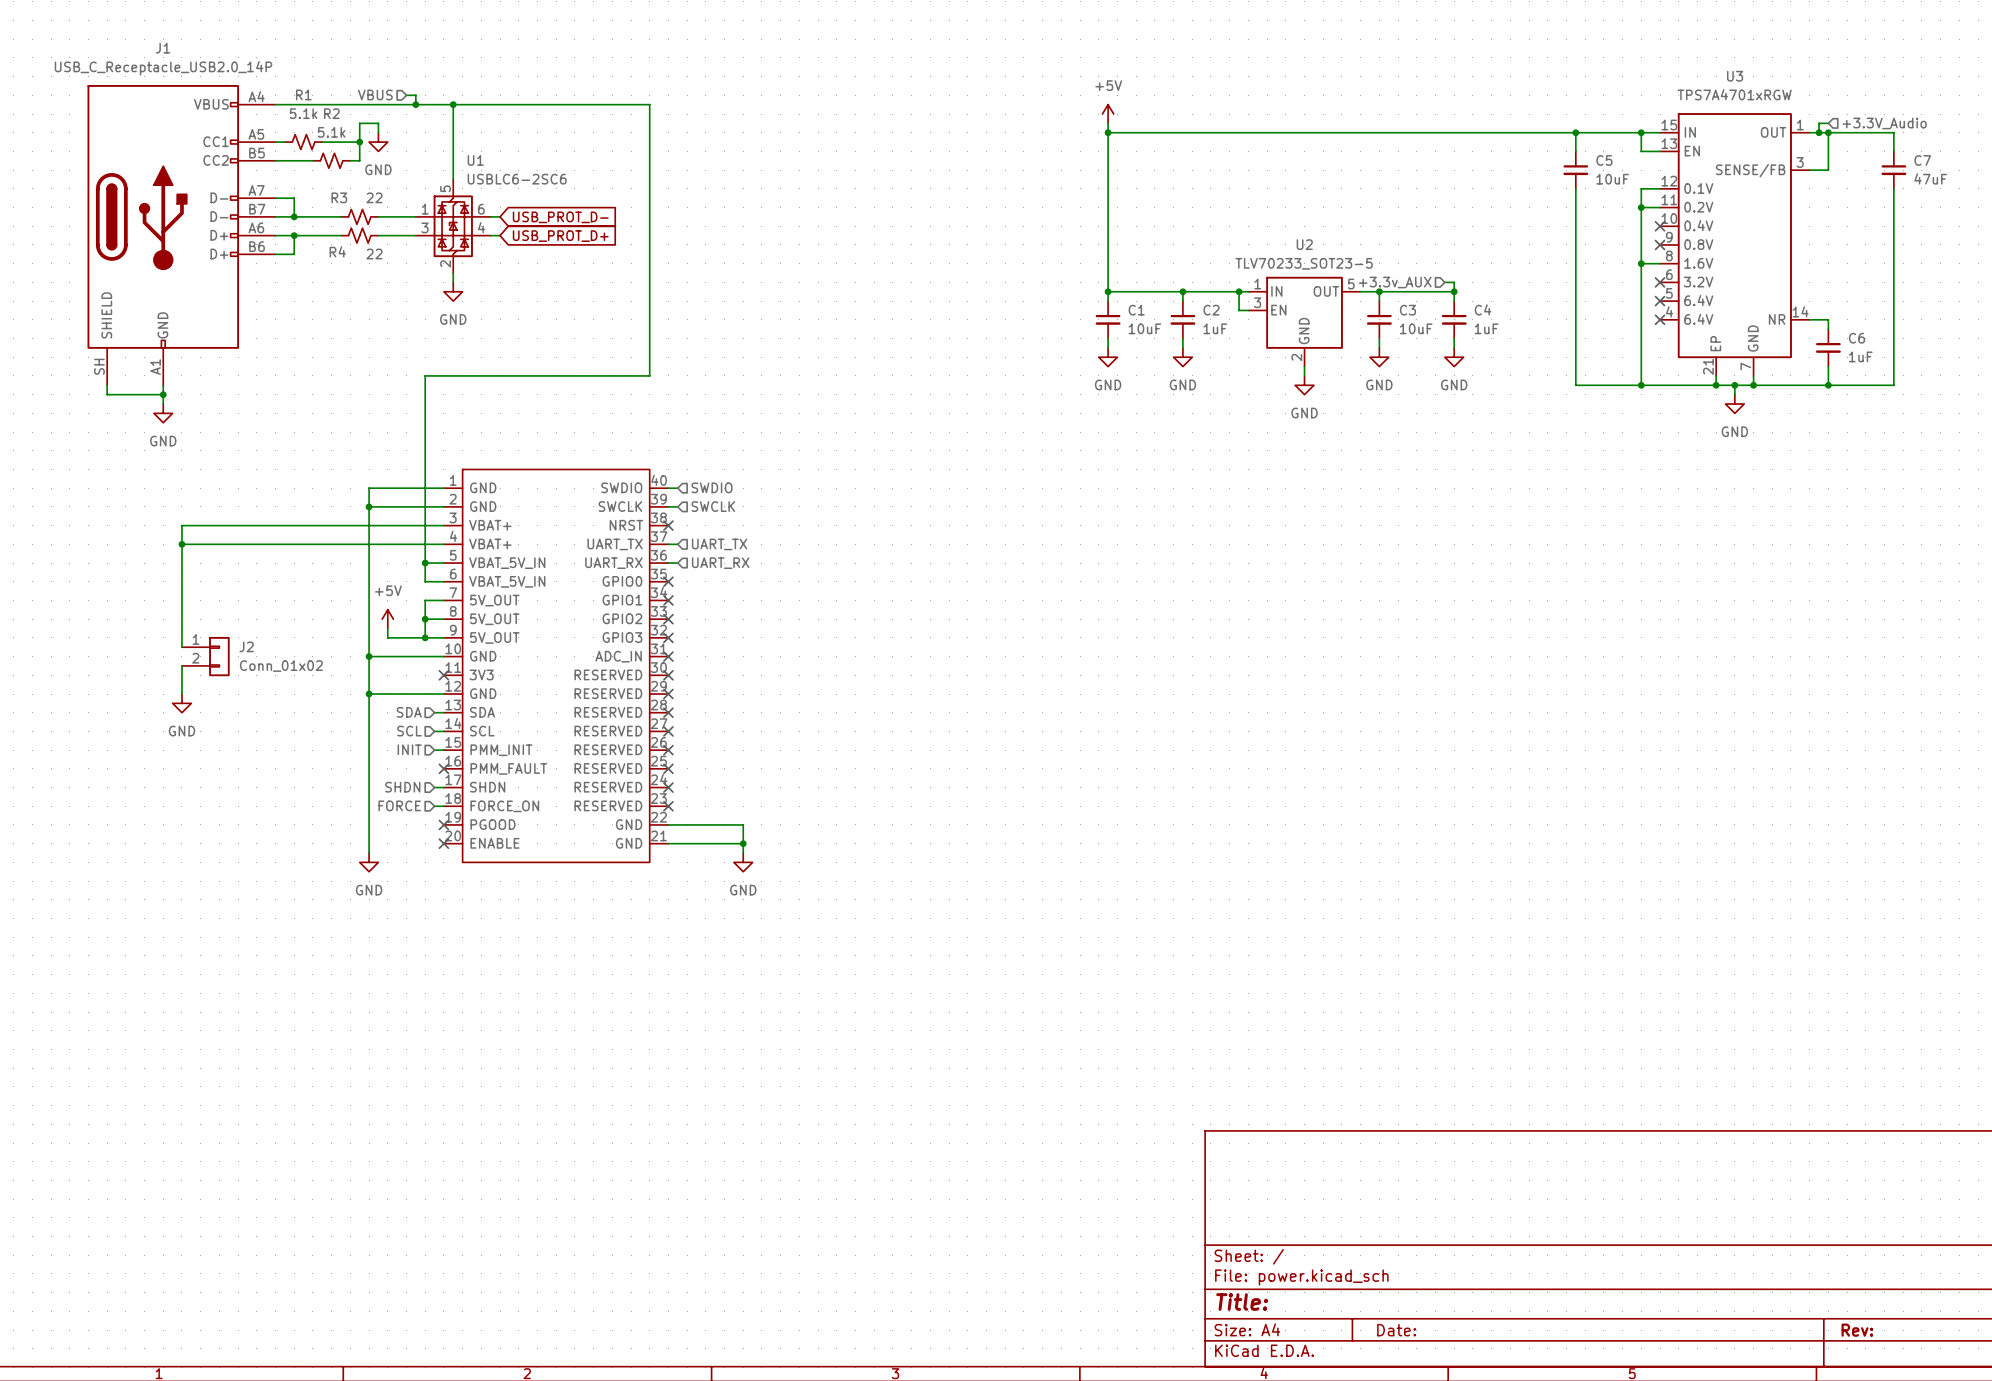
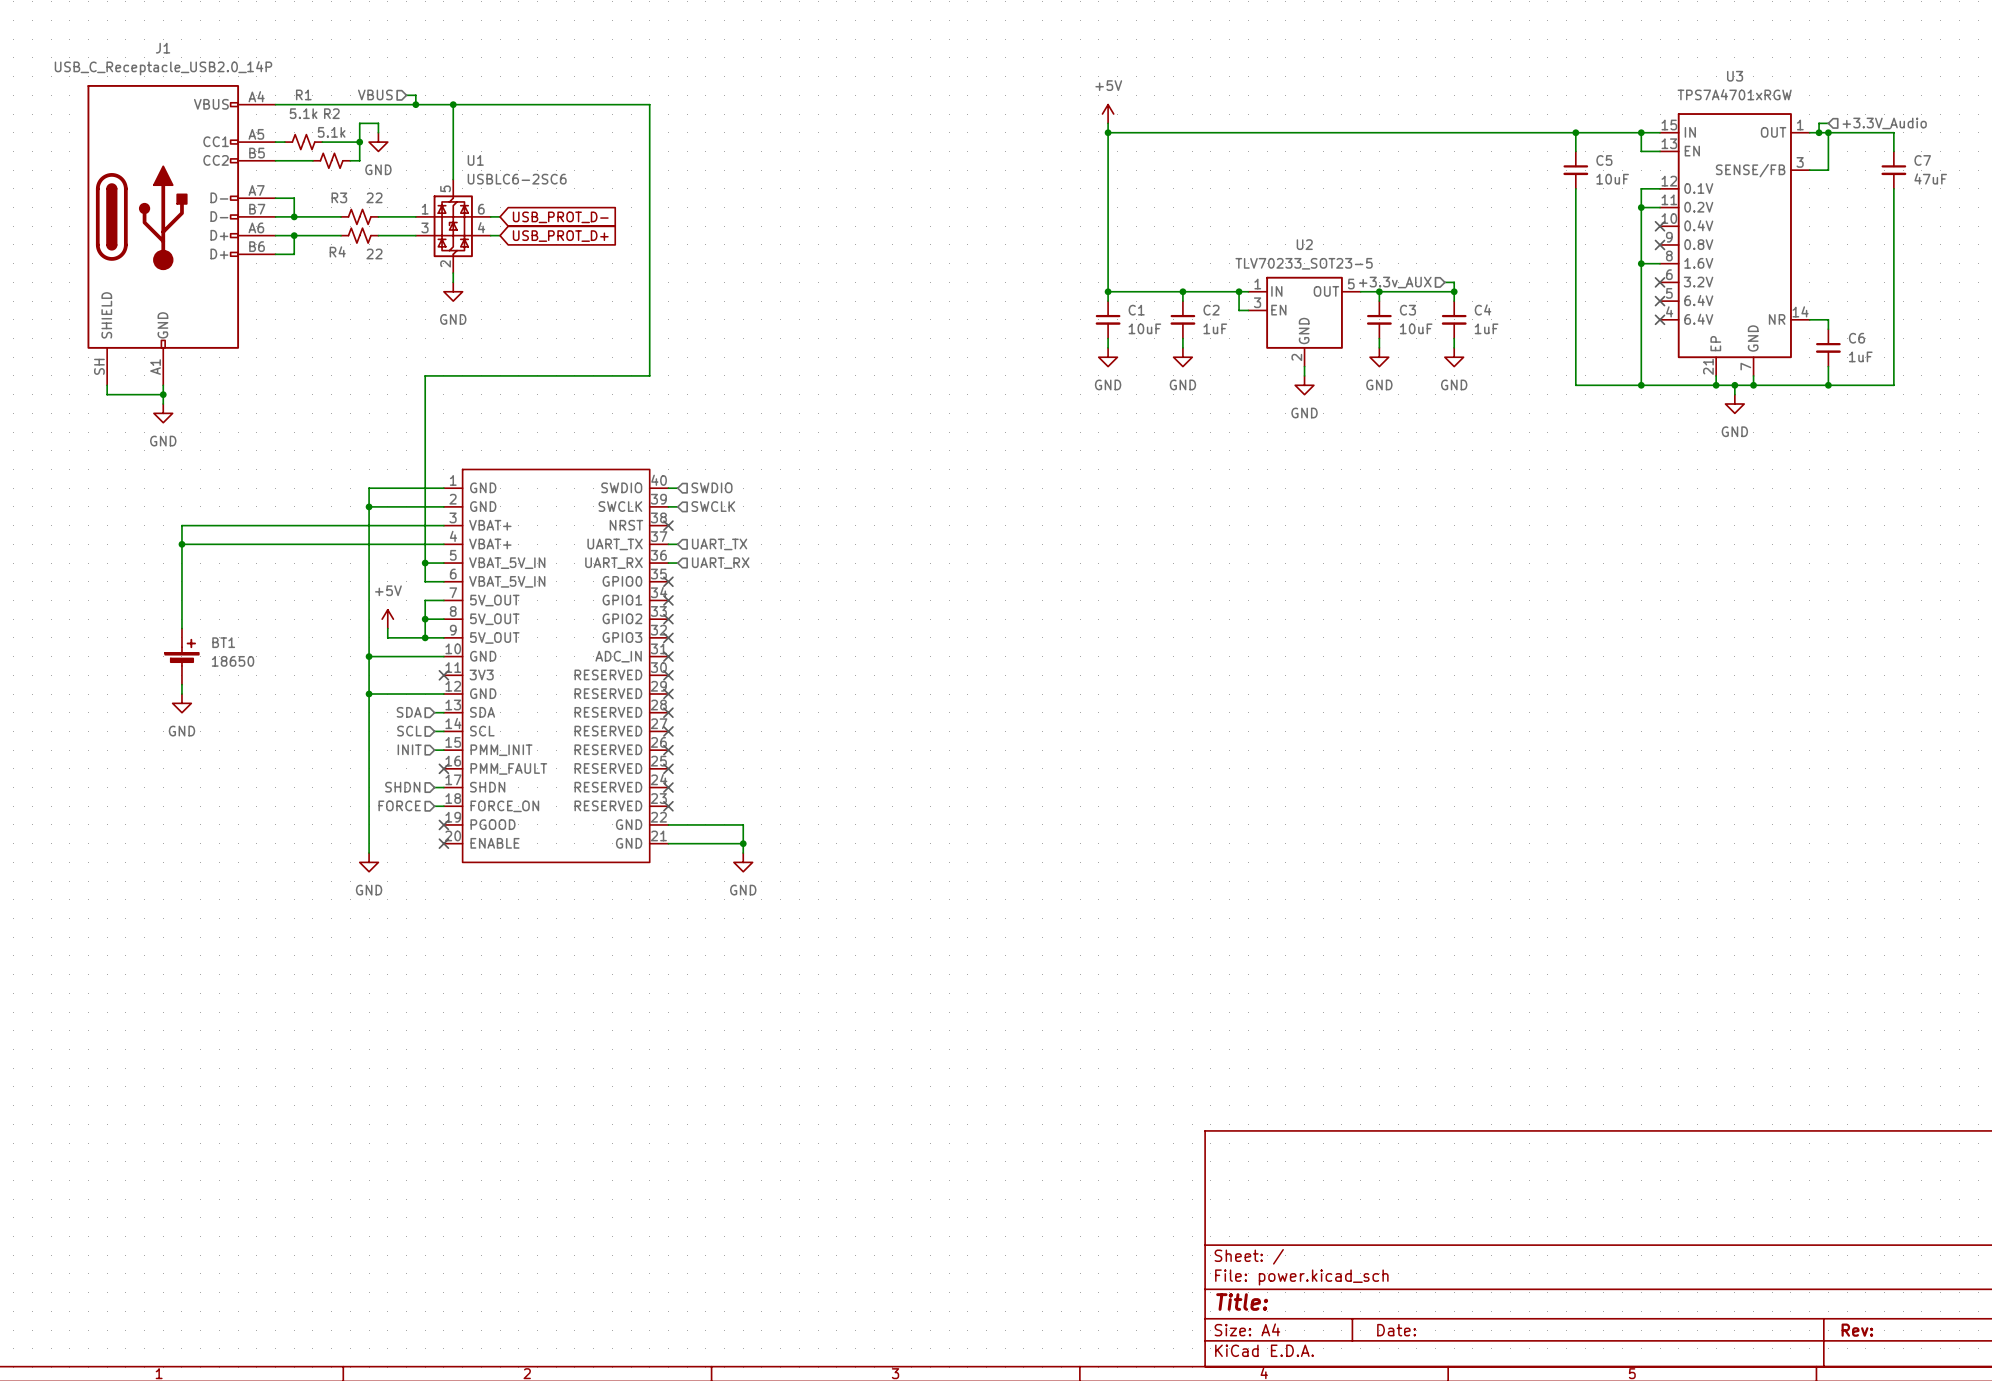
BT1: none -> 18650 (181, 656)
J2: Conn_01x02 (205, 656) -> none

